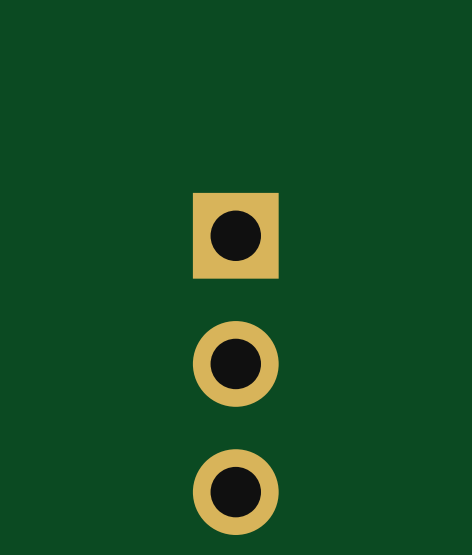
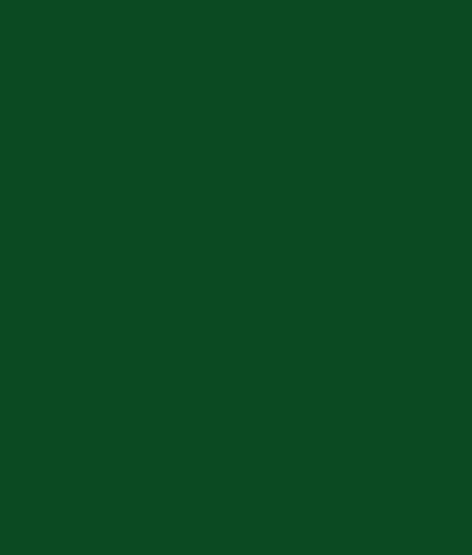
part: (235, 363) -> none

